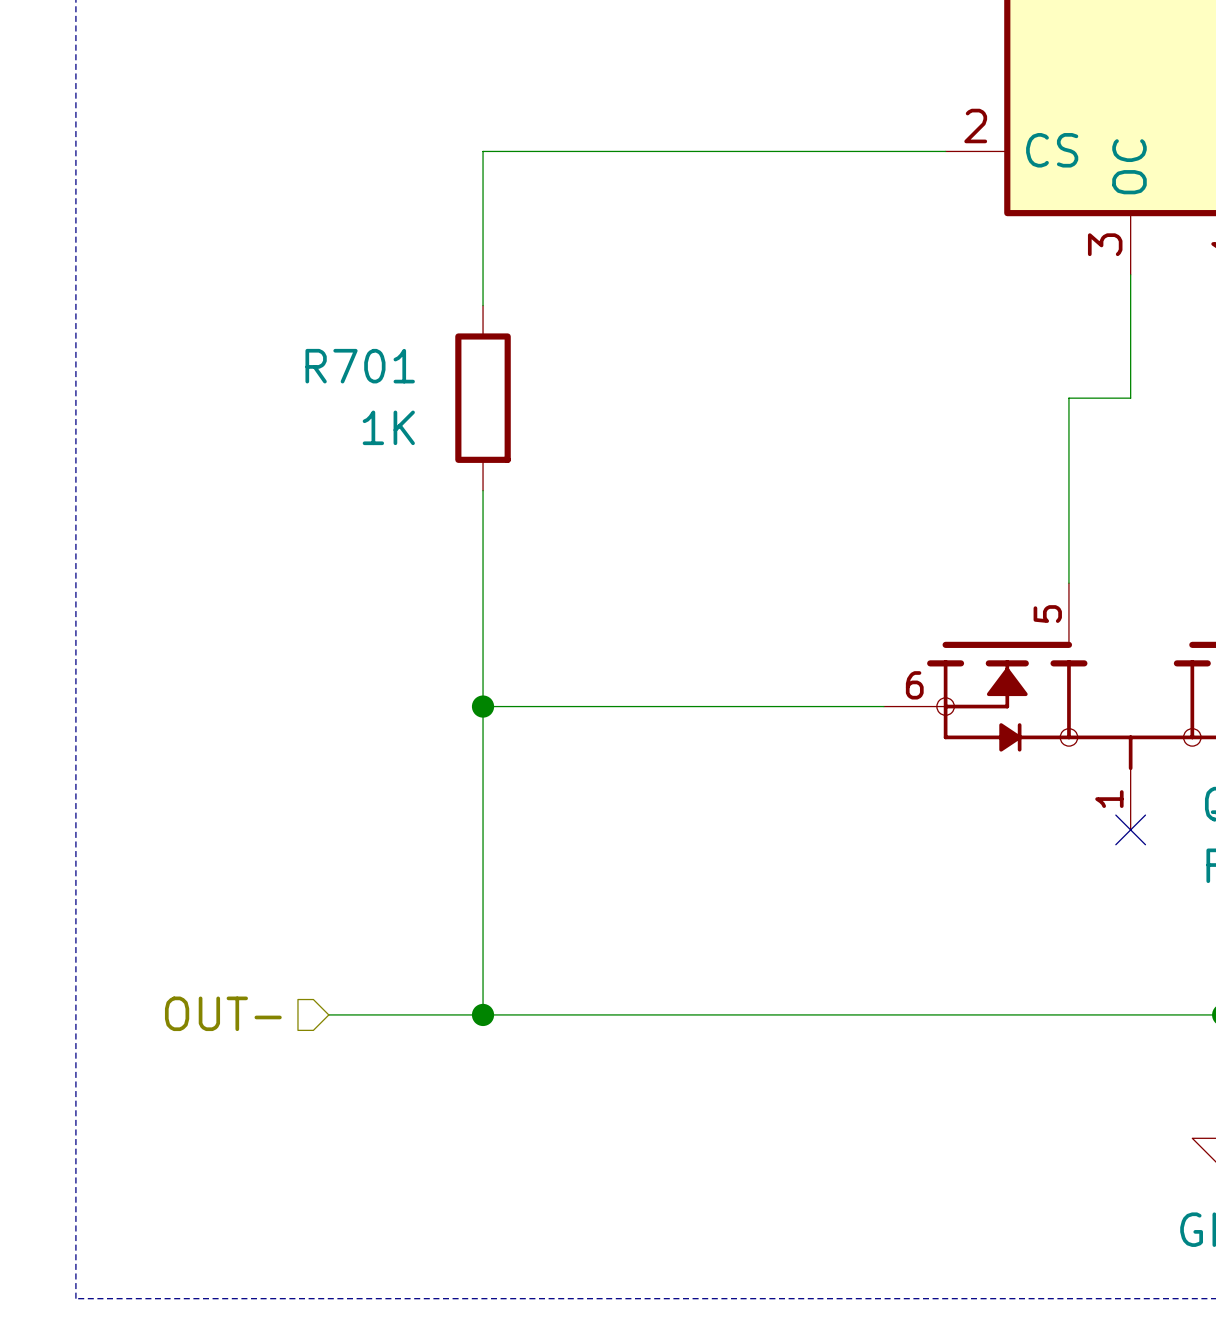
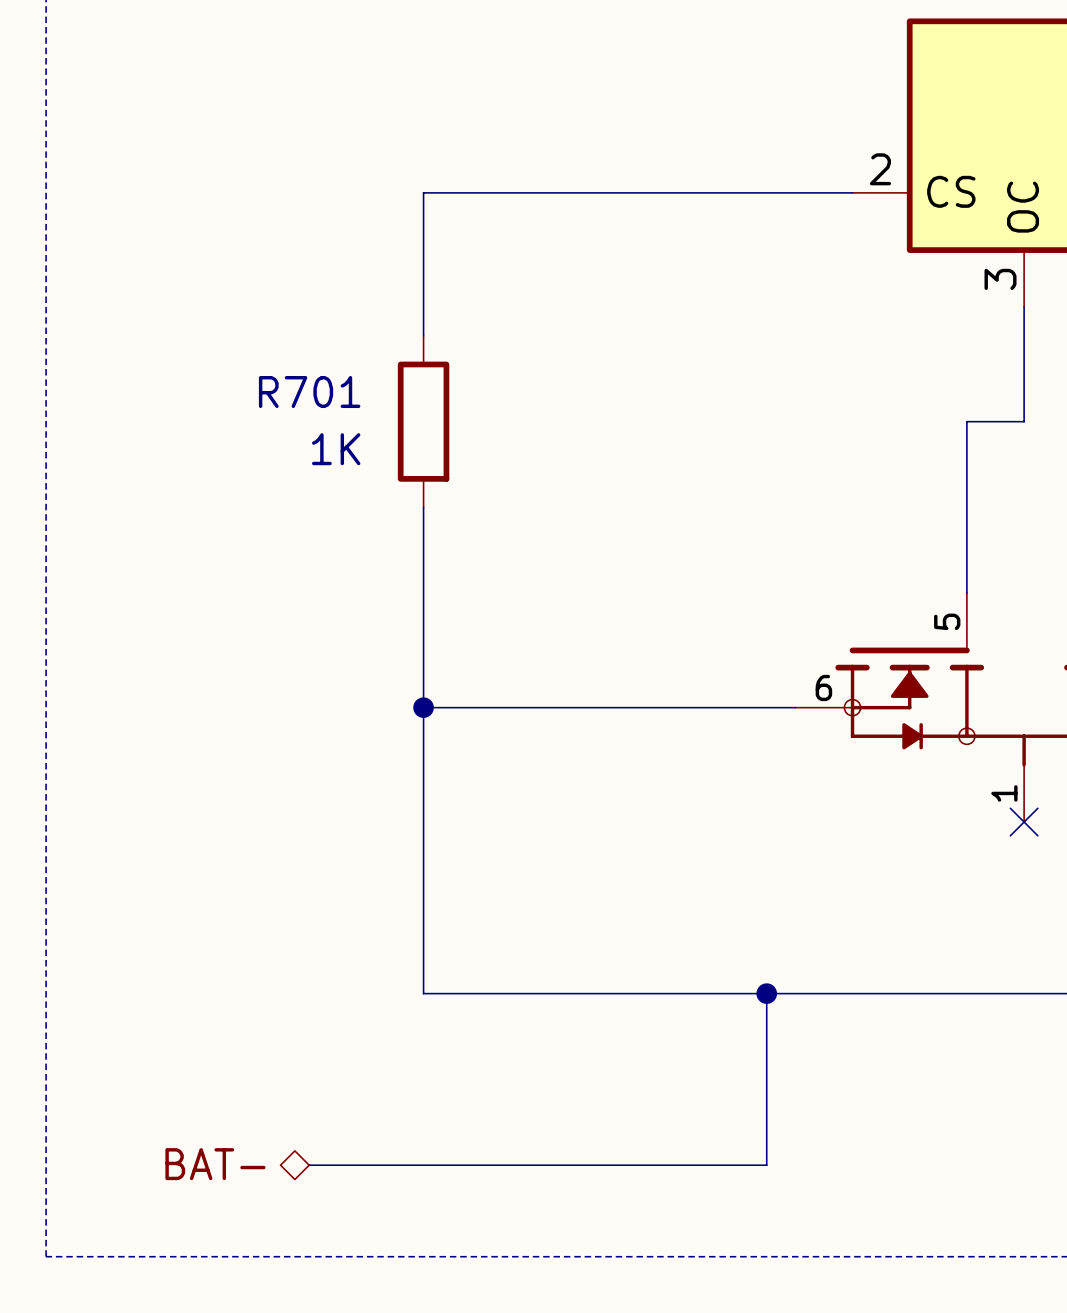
hierarchical label: OUT- (223, 1013) -> none
wire: (328, 1014) (483, 1014) -> none
junction: (483, 1014) -> none
wire: none -> (766, 993) (766, 1165) (309, 1165)
junction: none -> (766, 993)
hierarchical label: none -> BAT- (215, 1164)

